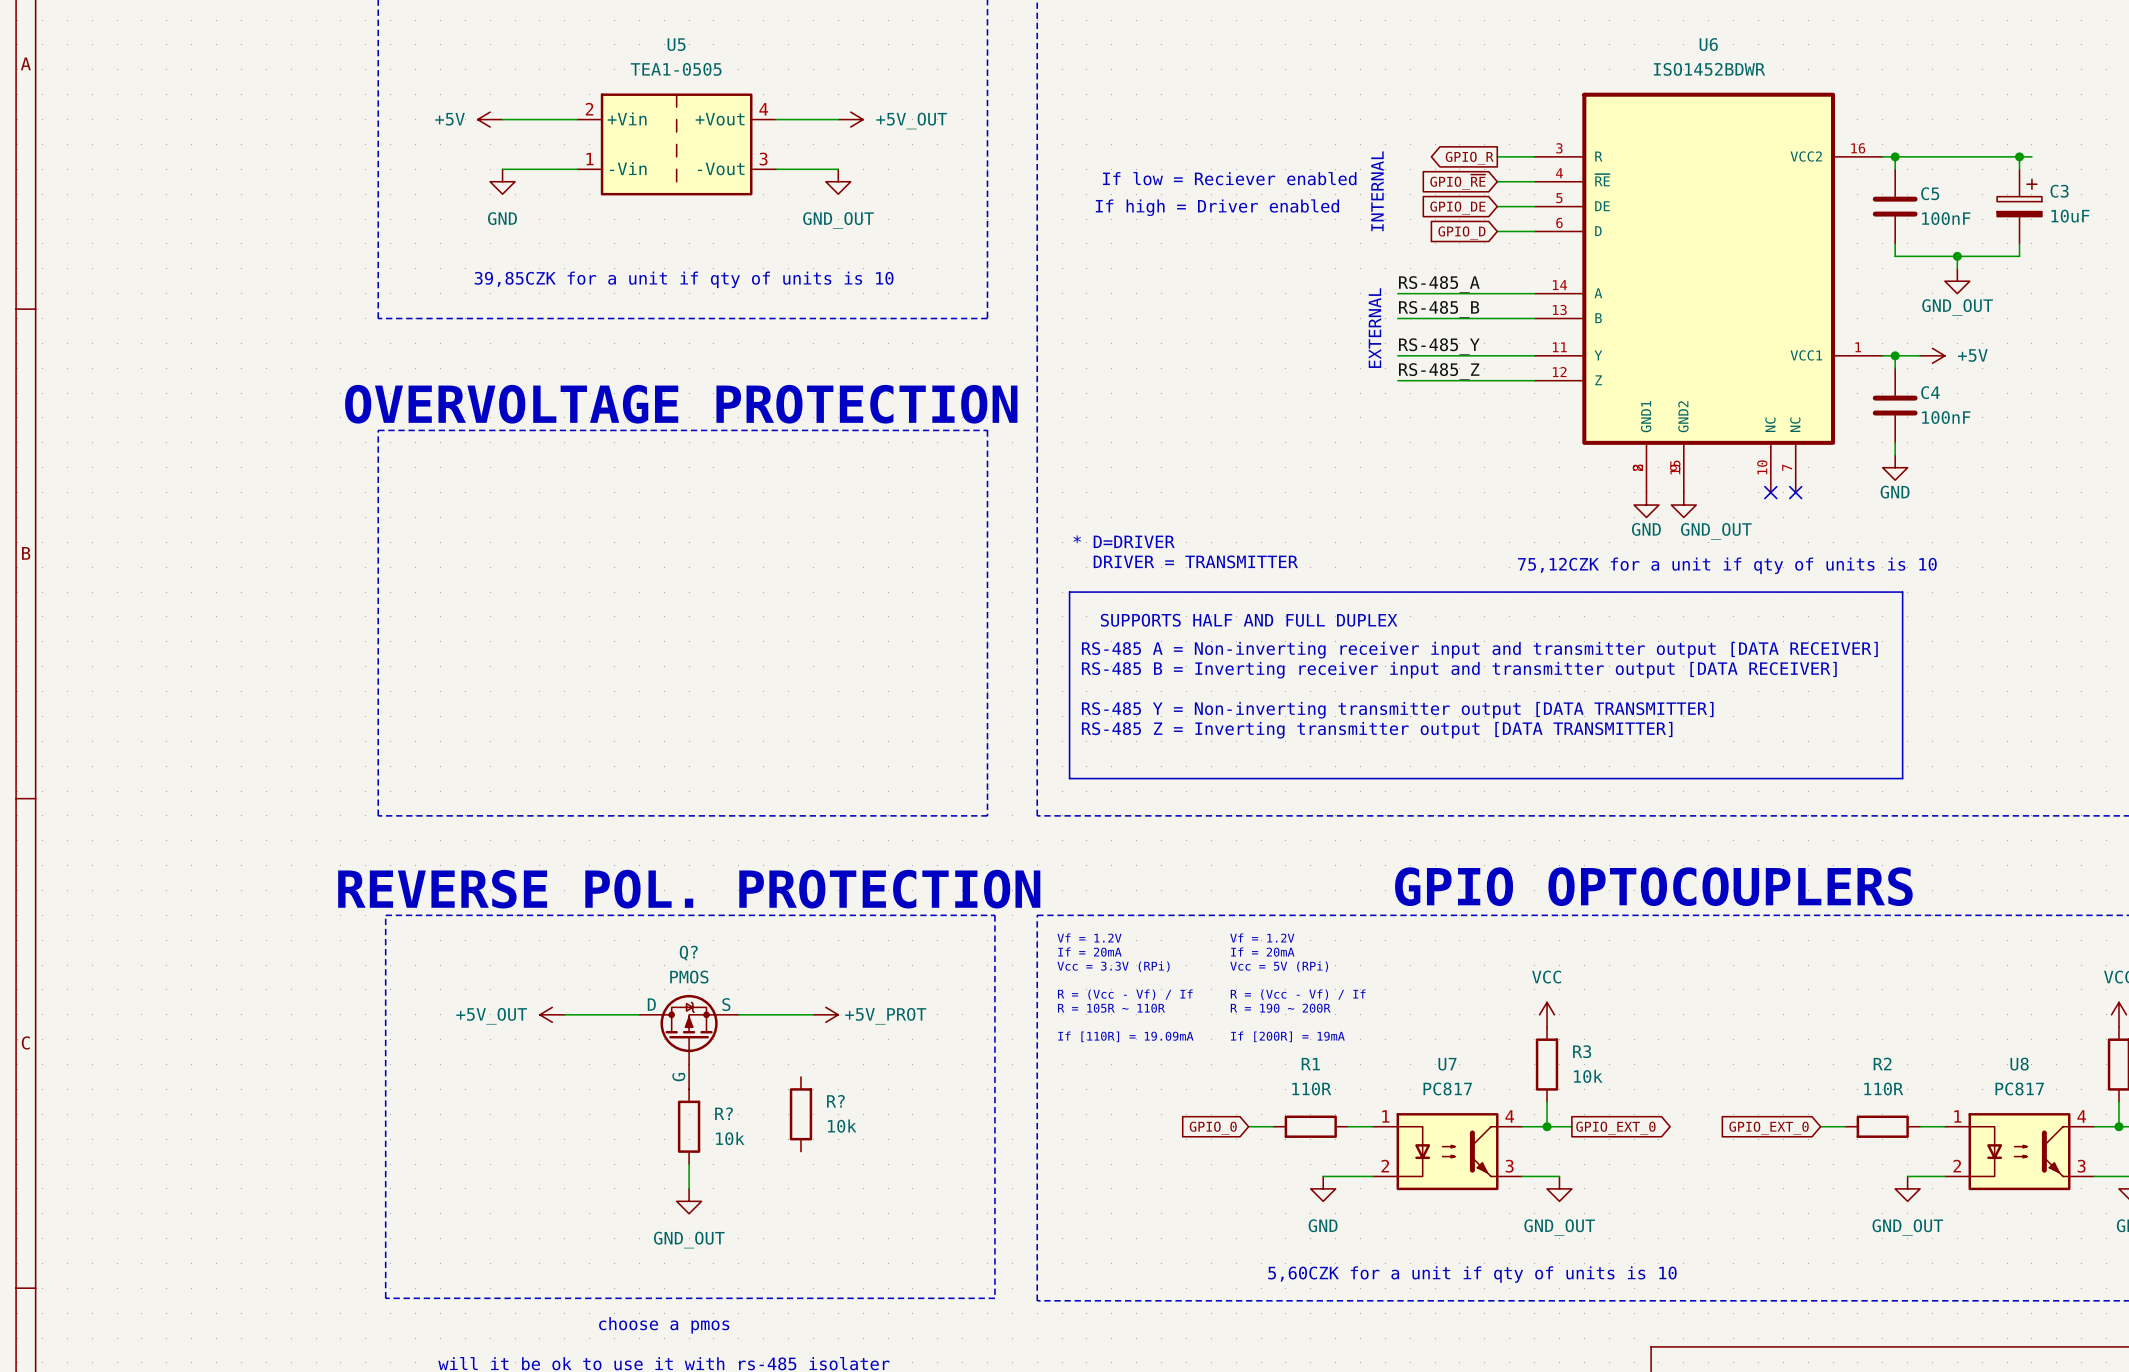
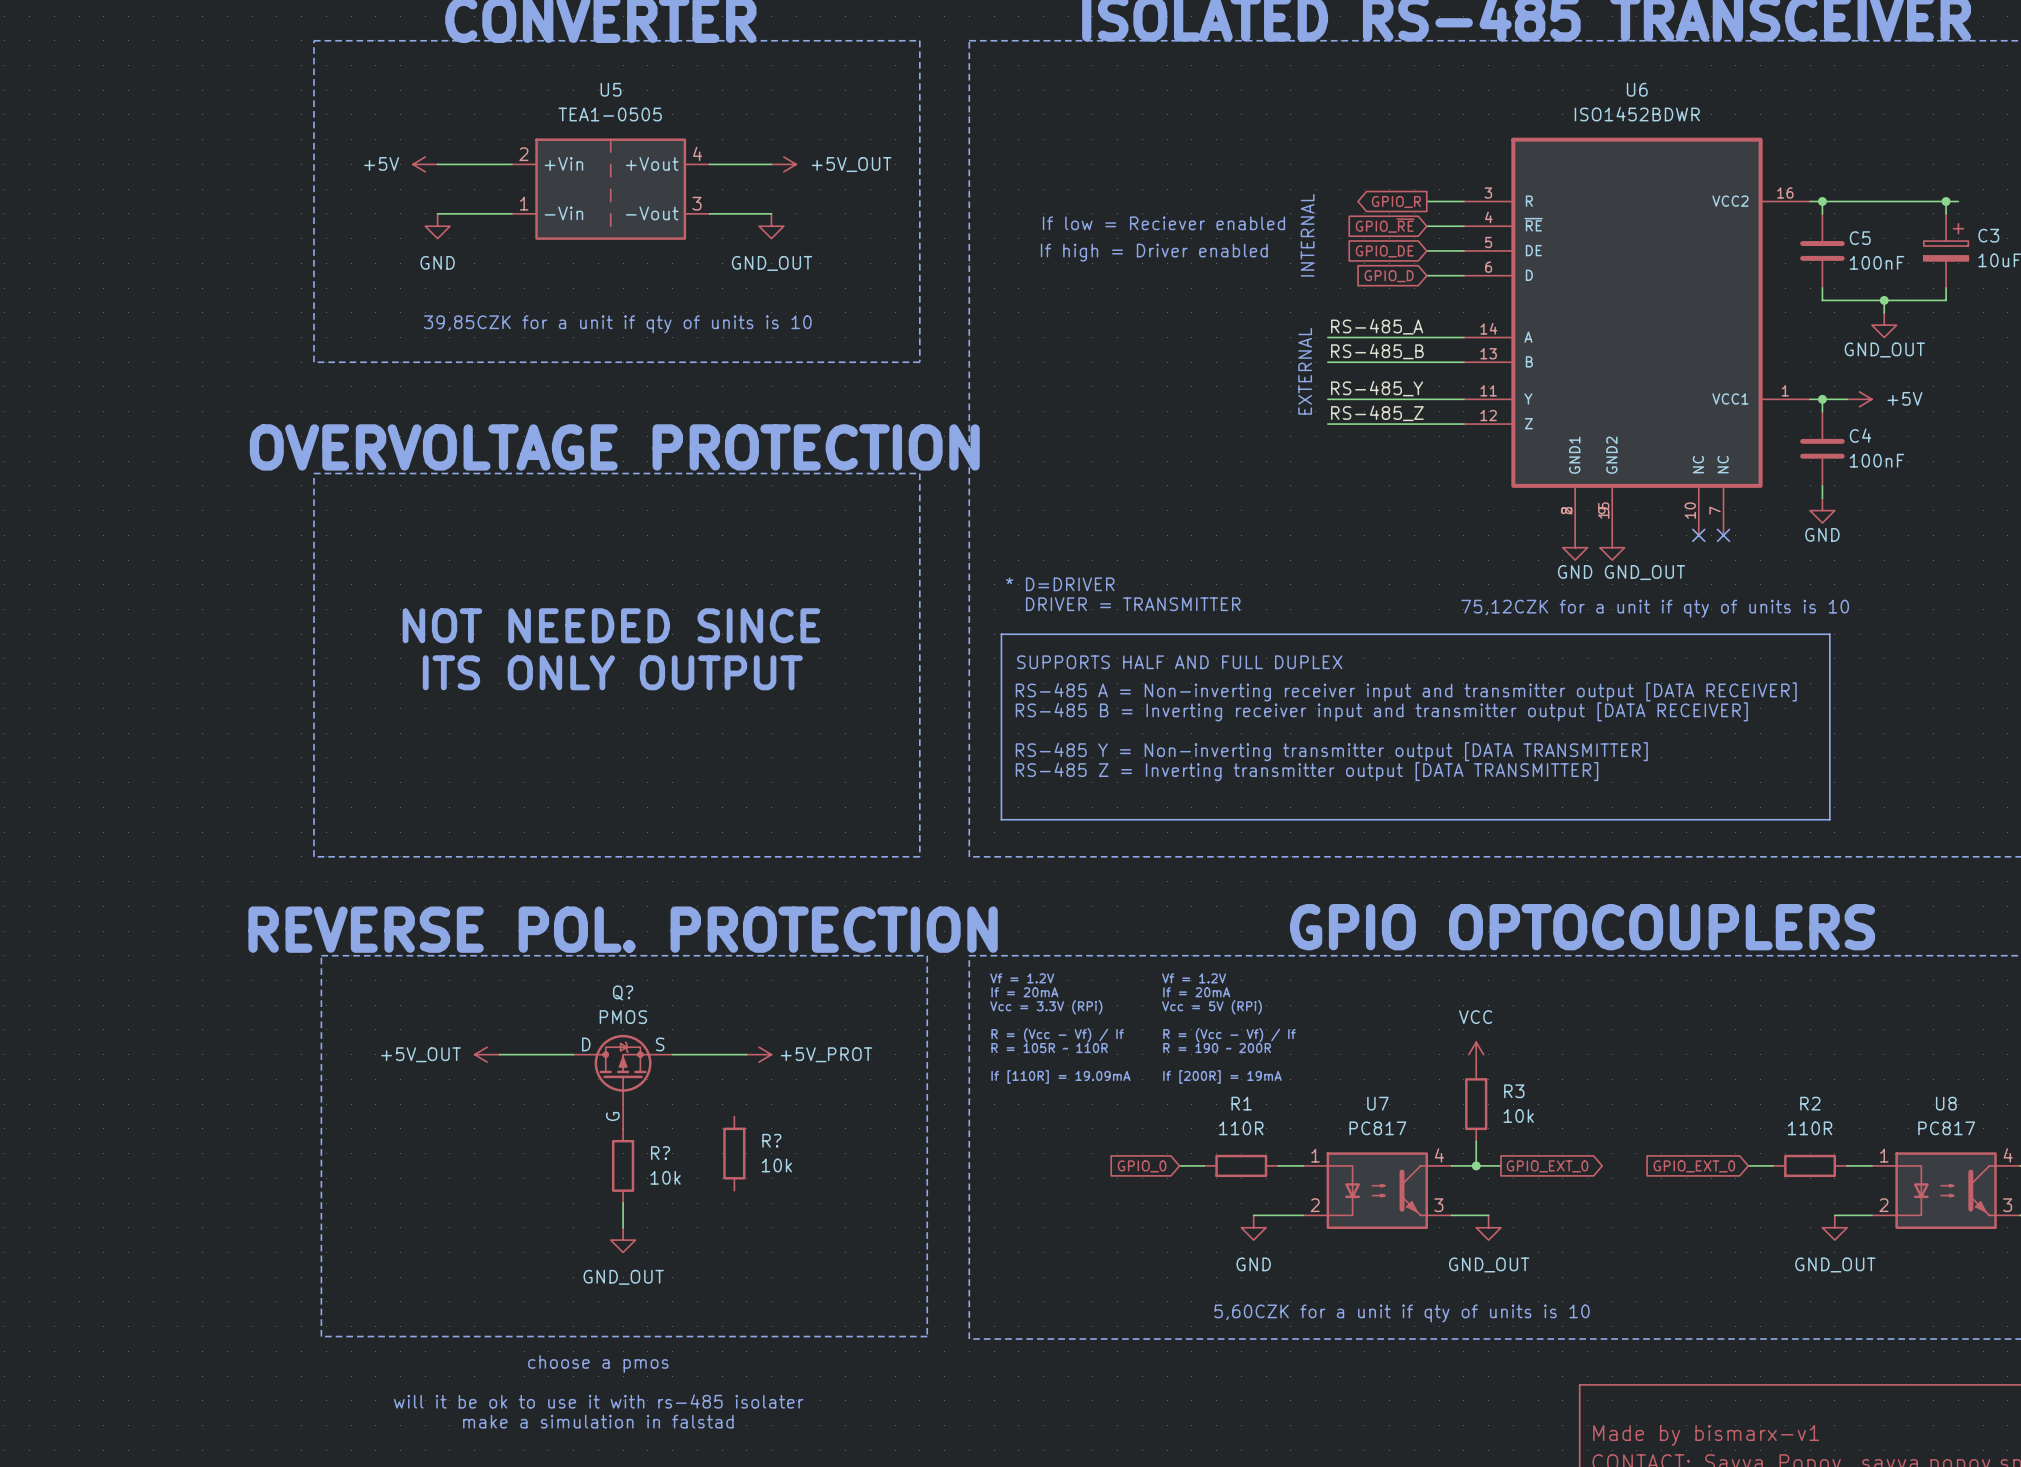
text: none -> NOT NEEDED SINCE (611, 625)
text: none -> ITS ONLY OUTPUT (612, 672)

